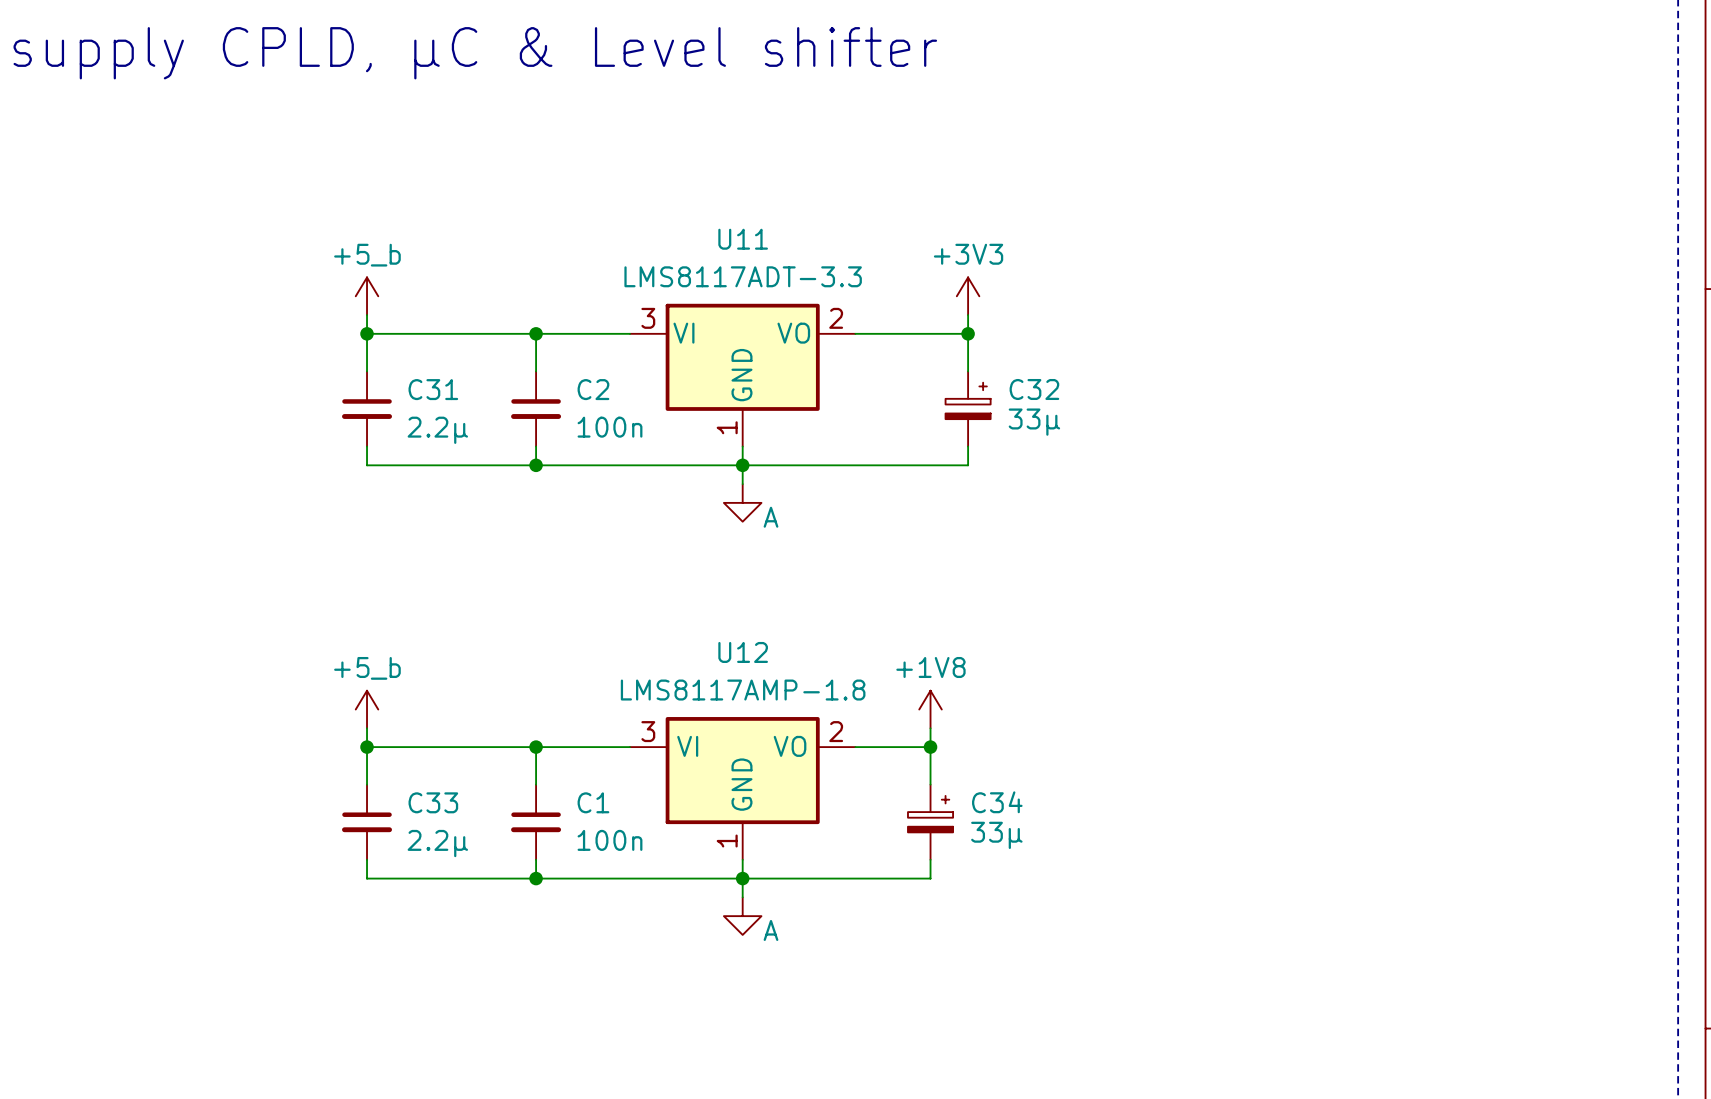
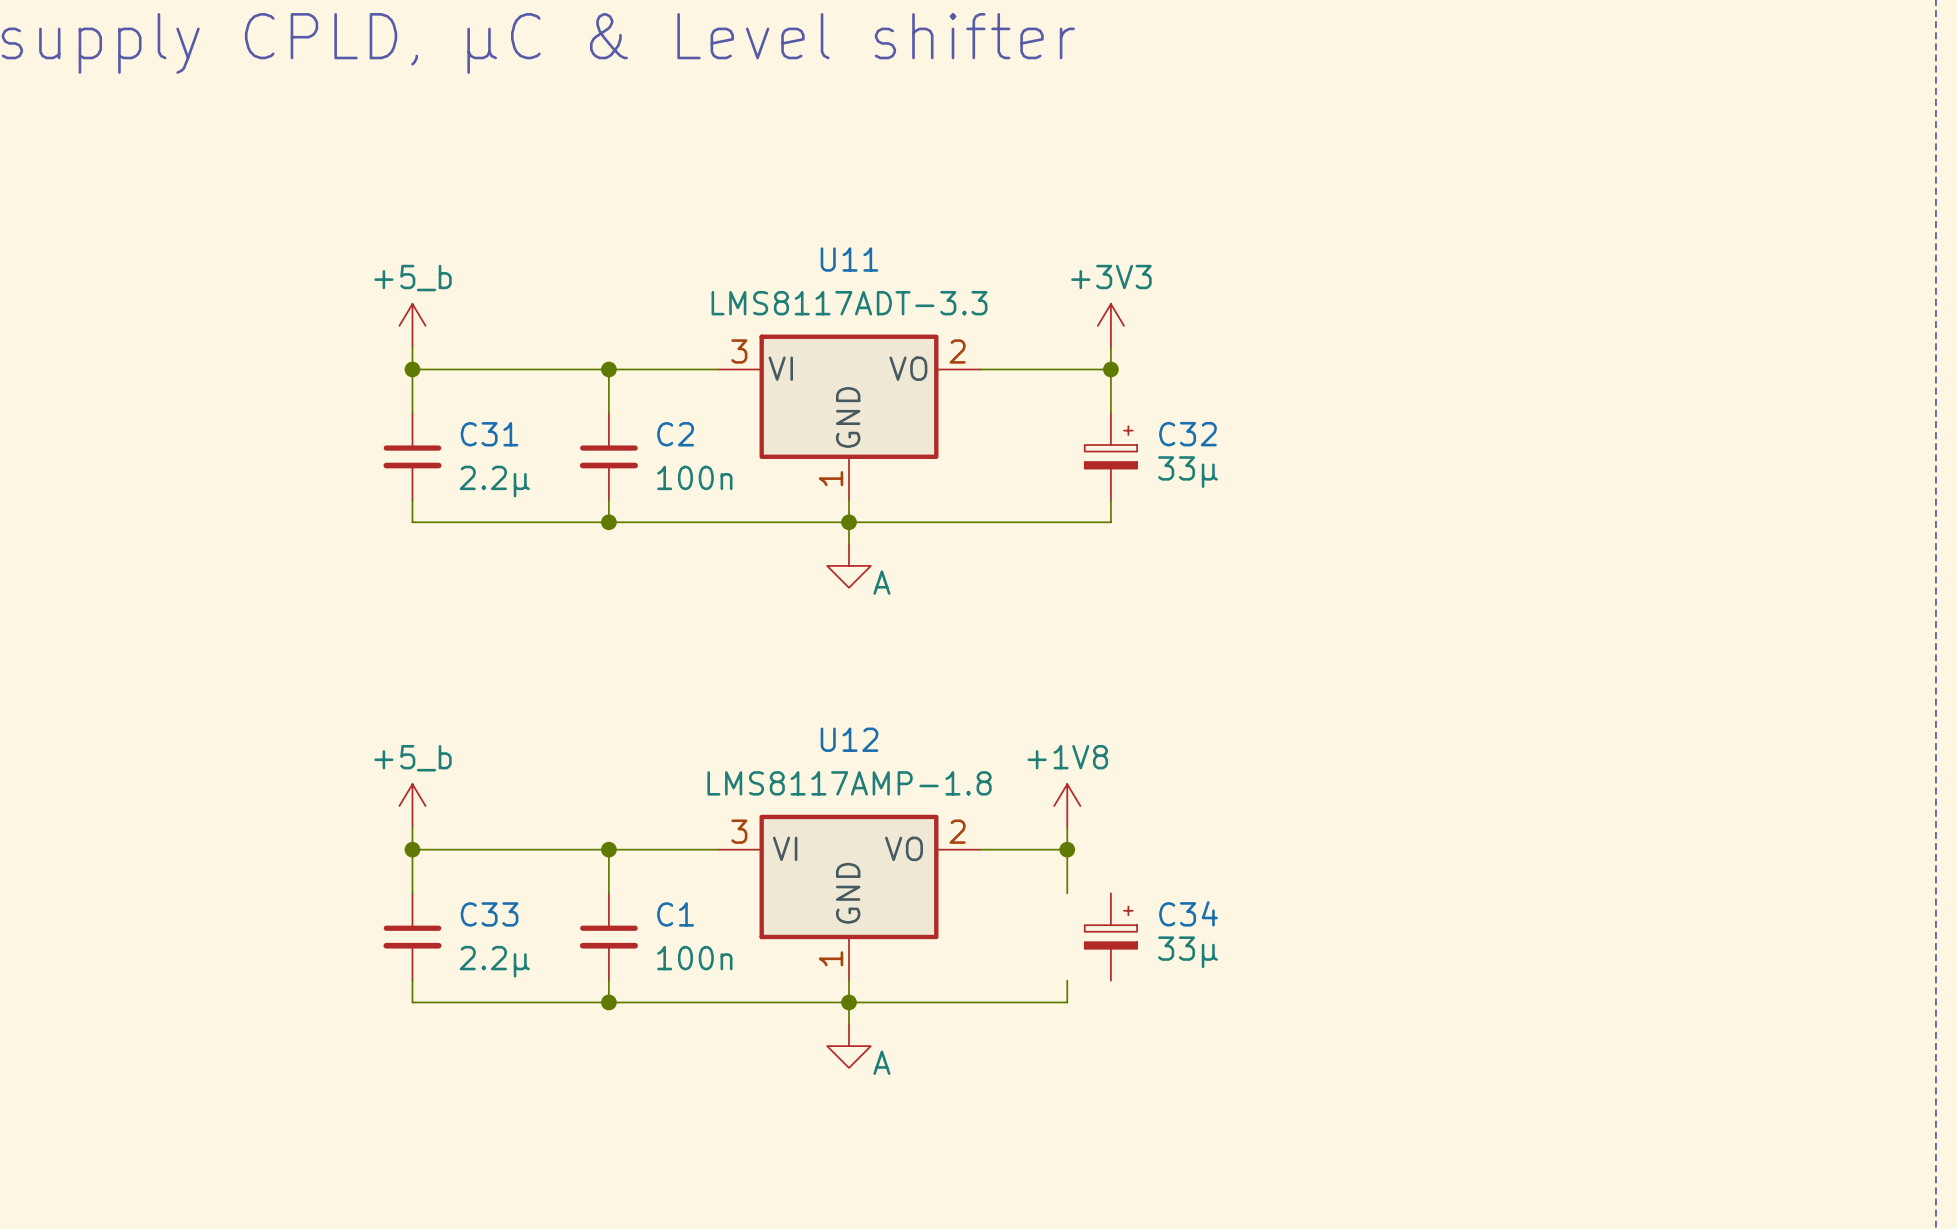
C34 position: (930, 822) -> (1110, 936)

